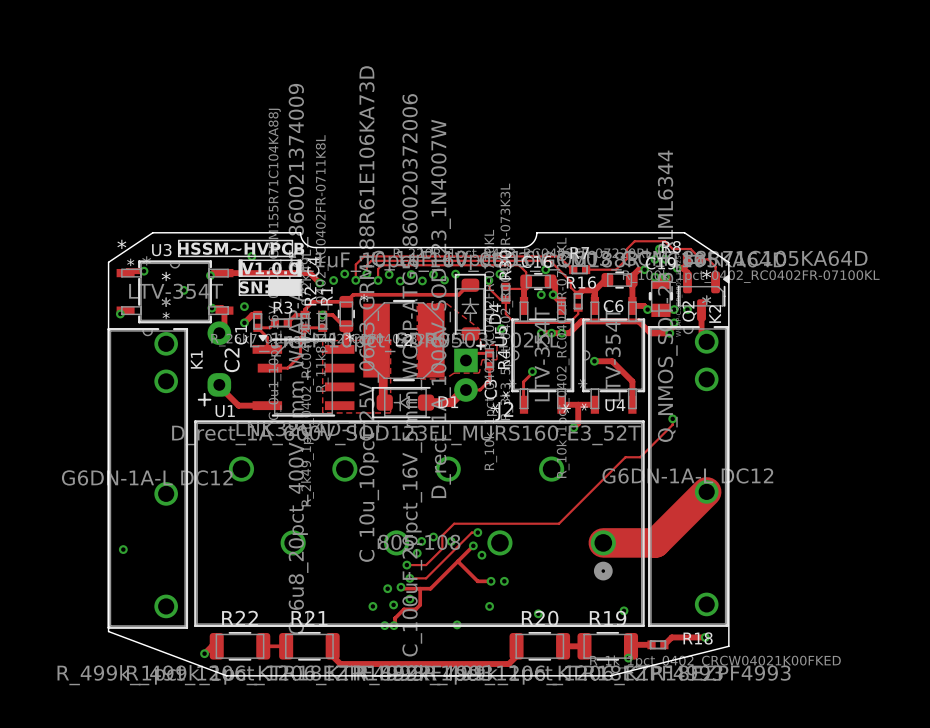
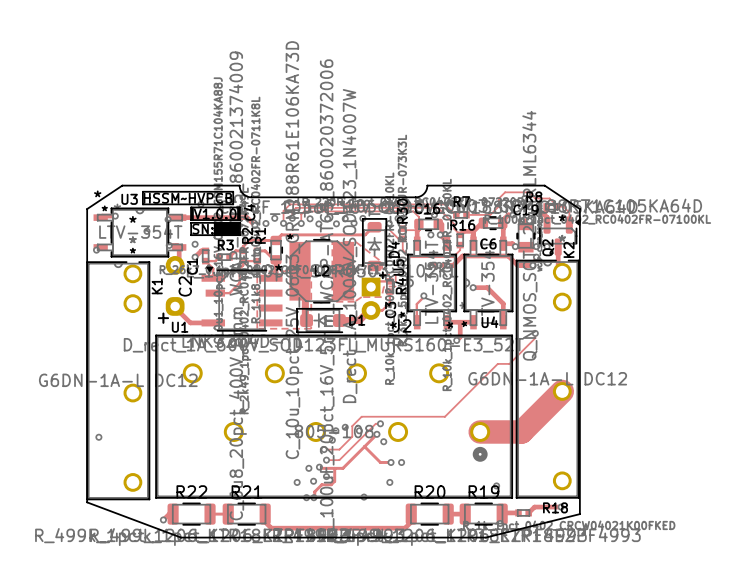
via: (538, 613) -> none

